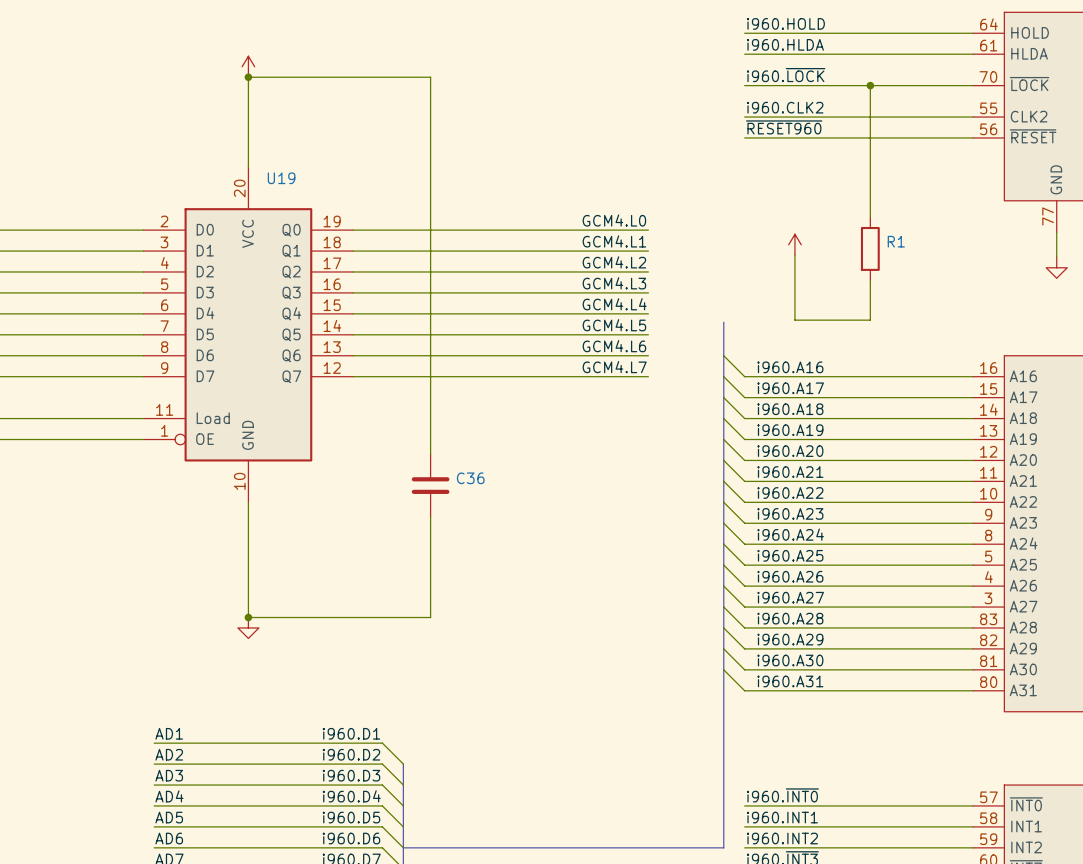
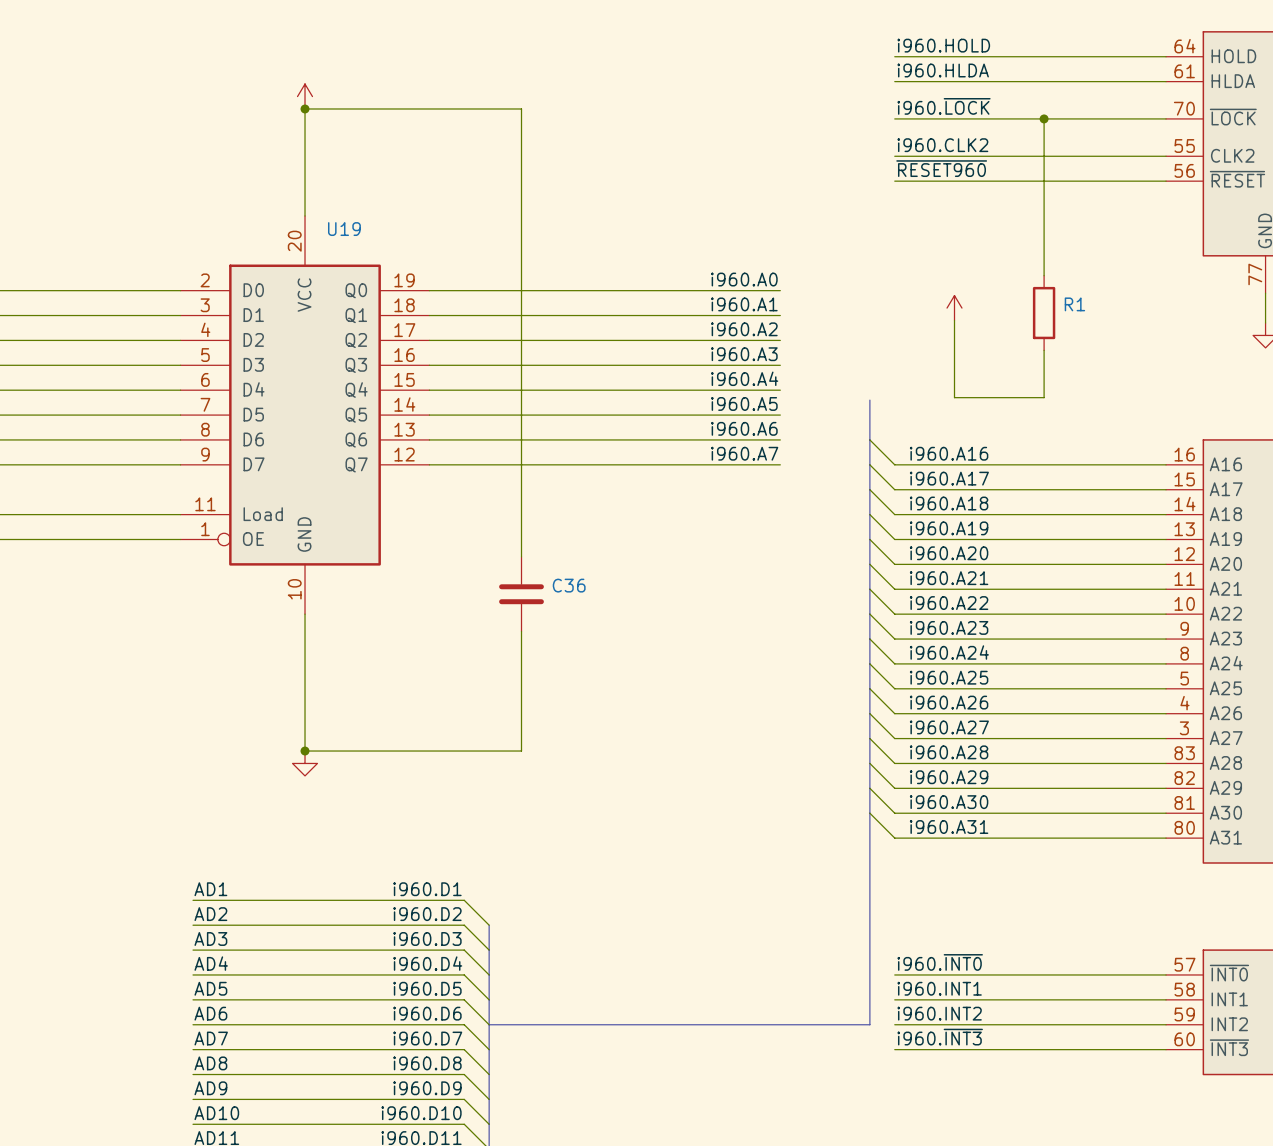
label: GCM4.L0 (614, 220) -> i960.A0 (744, 279)
label: GCM4.L1 (614, 241) -> i960.A1 (744, 304)
label: GCM4.L2 (614, 262) -> i960.A2 (744, 329)
label: GCM4.L3 (614, 283) -> i960.A3 (744, 354)
label: GCM4.L4 (614, 304) -> i960.A4 (744, 378)
label: GCM4.L5 (614, 325) -> i960.A5 (744, 403)
label: GCM4.L6 (614, 346) -> i960.A6 (744, 428)
label: GCM4.L7 (614, 367) -> i960.A7 (744, 453)

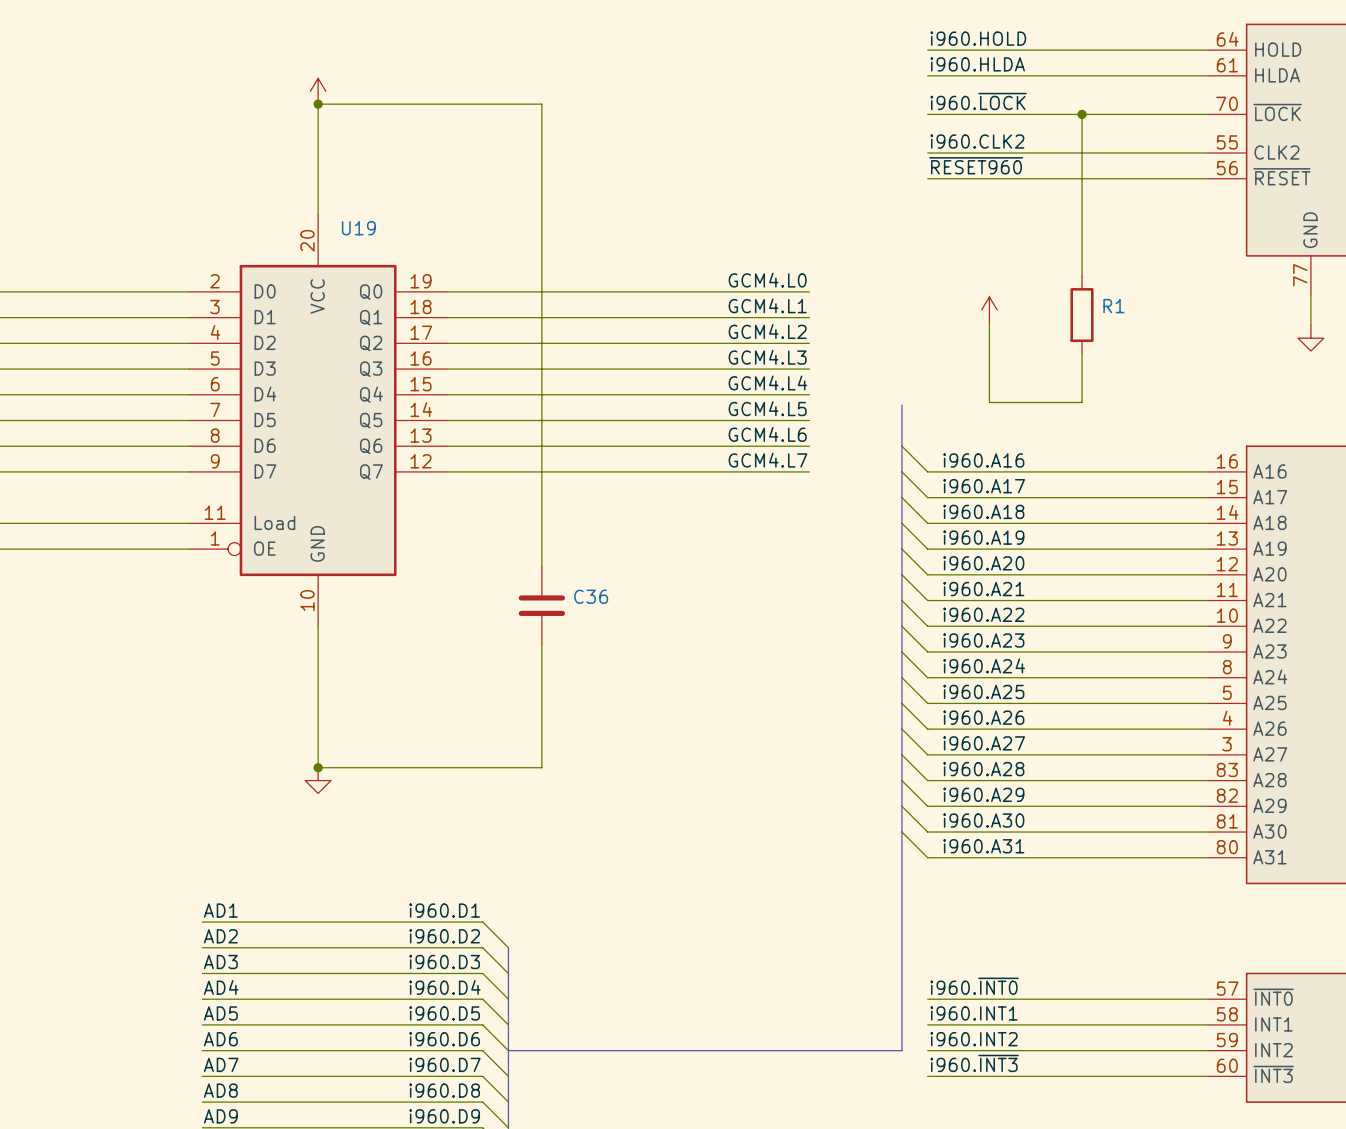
label: i960.A0 (744, 279) -> GCM4.L0 (767, 280)
label: i960.A1 (744, 304) -> GCM4.L1 (767, 305)
label: i960.A2 (744, 329) -> GCM4.L2 (767, 331)
label: i960.A3 (744, 354) -> GCM4.L3 (767, 357)
label: i960.A4 (744, 378) -> GCM4.L4 (767, 382)
label: i960.A5 (744, 403) -> GCM4.L5 (767, 408)
label: i960.A6 (744, 428) -> GCM4.L6 (767, 434)
label: i960.A7 (744, 453) -> GCM4.L7 (767, 460)

